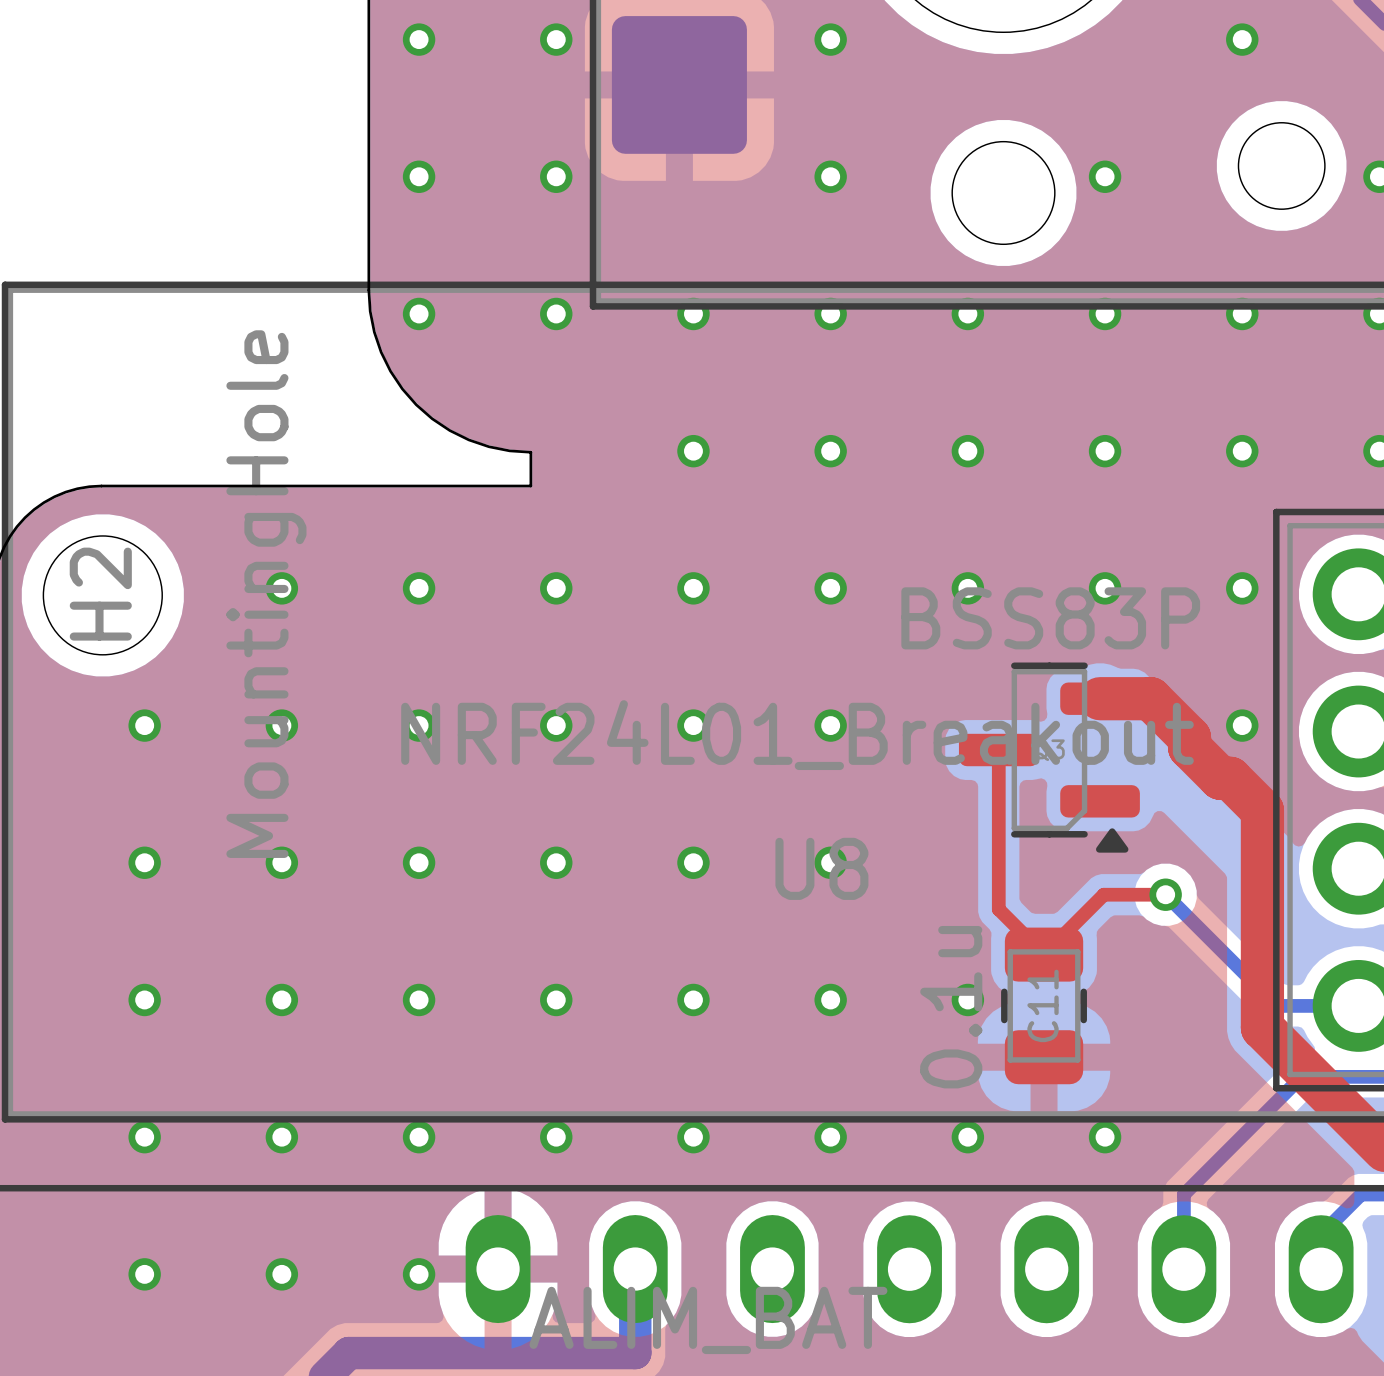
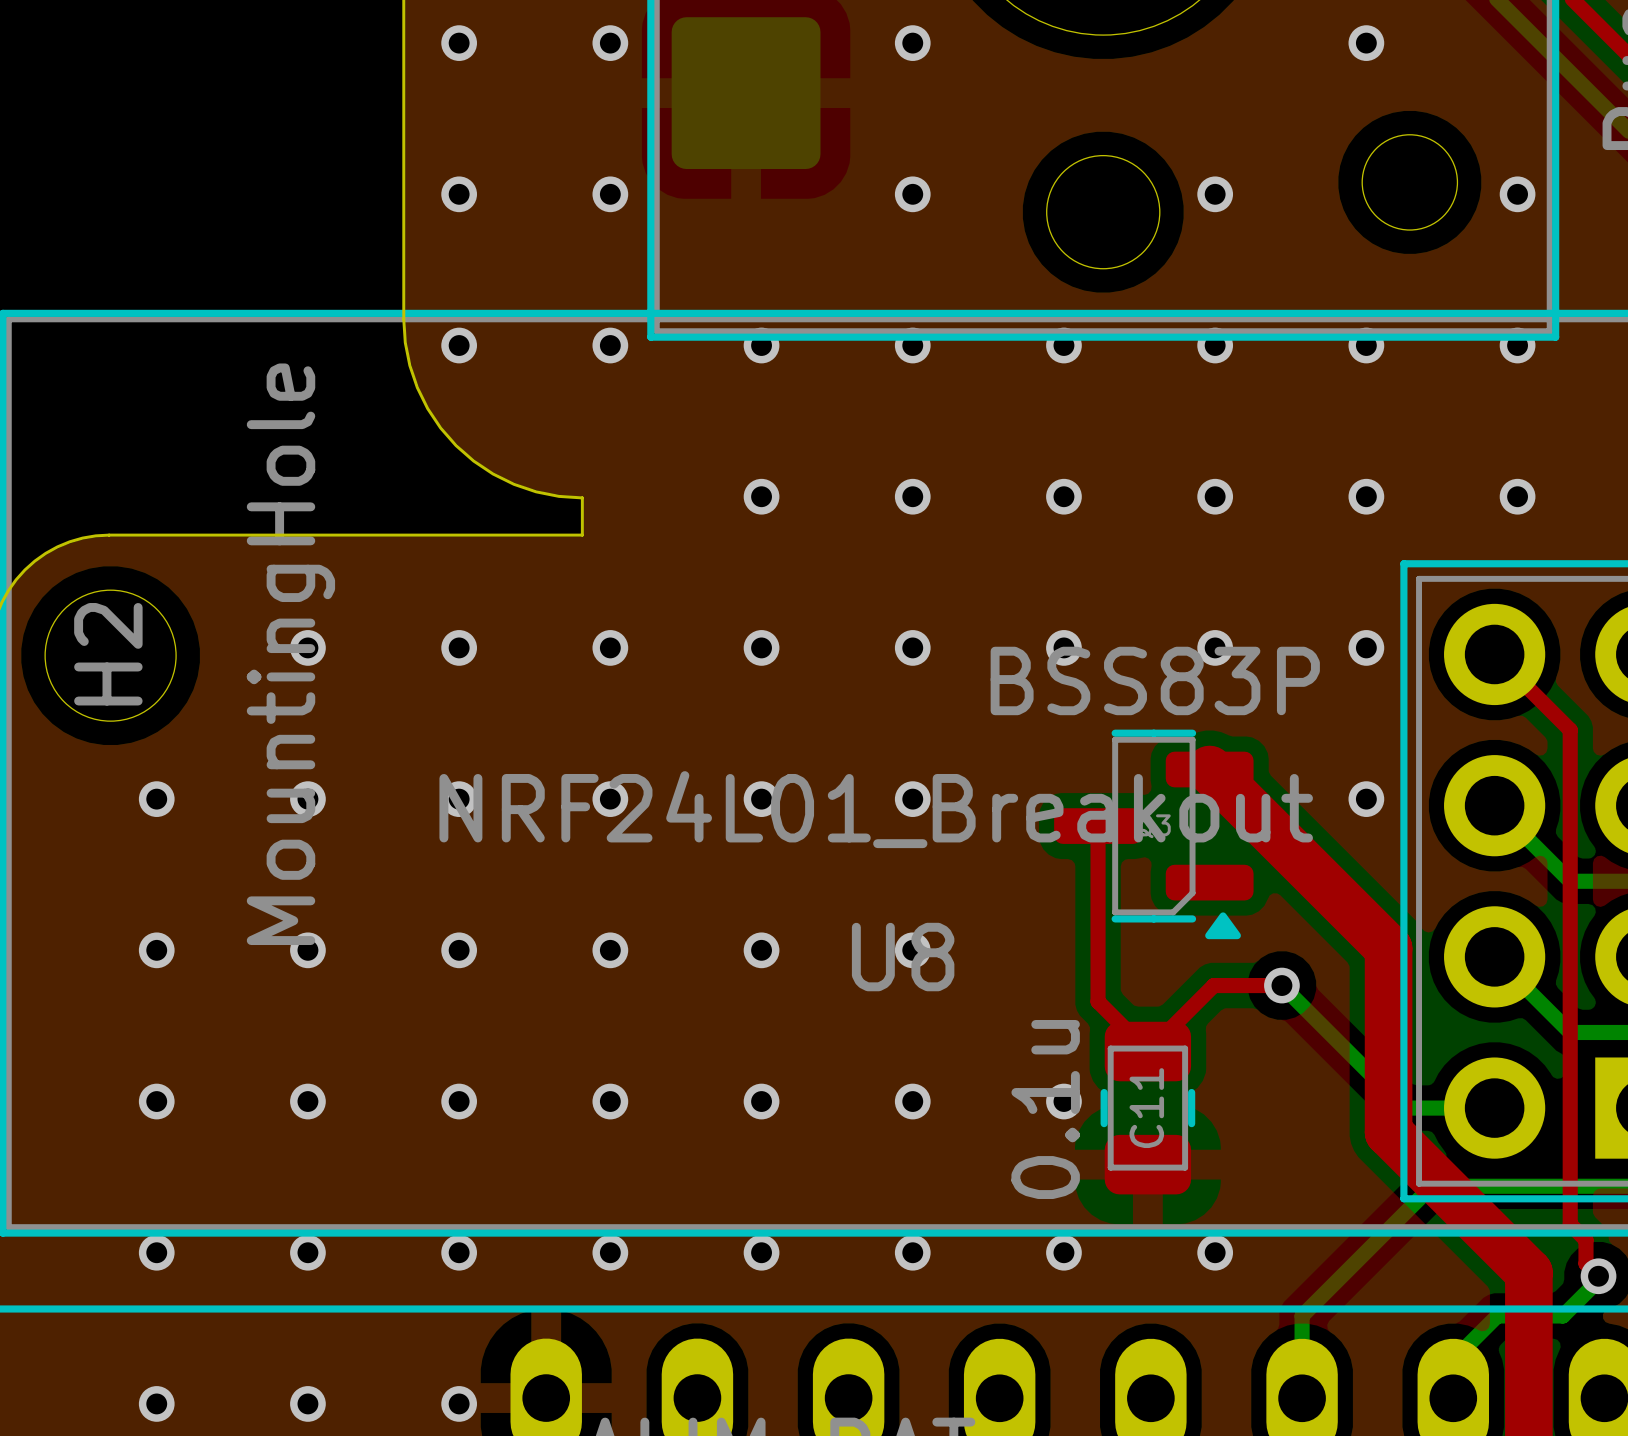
top track: (1100, 698) (1150, 698) (1189, 737) (1189, 747) (1220, 778) (1230, 778) (1262, 810) (1262, 861) -> (1209, 769) (1388, 948)

